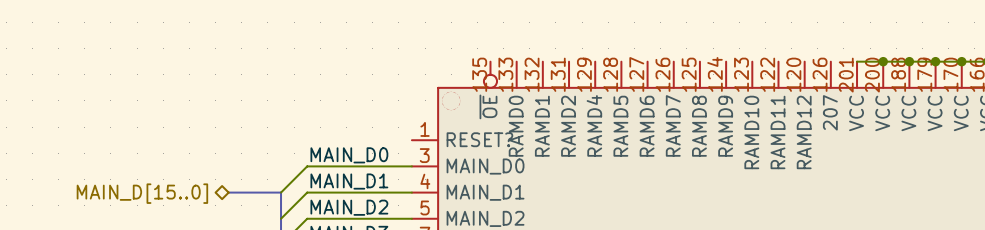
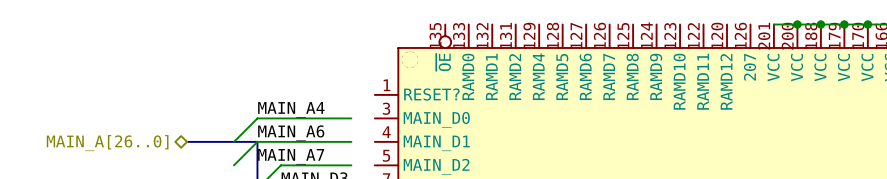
label: none -> MAIN_A4 (291, 109)
label: MAIN_D0 (349, 155) -> none
wire: (307, 166) (281, 192) -> (280, 118) (257, 118) (233, 141)
wire: (385, 166) (411, 166) -> none
label: none -> MAIN_A6 (291, 133)
label: MAIN_D1 (349, 181) -> none
bus: none -> (187, 141) (210, 141)
wire: (307, 192) (281, 218) -> (280, 141) (257, 141) (233, 165)
wire: (385, 192) (411, 192) -> none
hierarchical label: MAIN_D[15..0] (142, 193) -> MAIN_A[26..0] (107, 143)
label: none -> MAIN_A7 (291, 156)
label: MAIN_D2 (349, 207) -> none
wire: (385, 218) (411, 218) -> none

